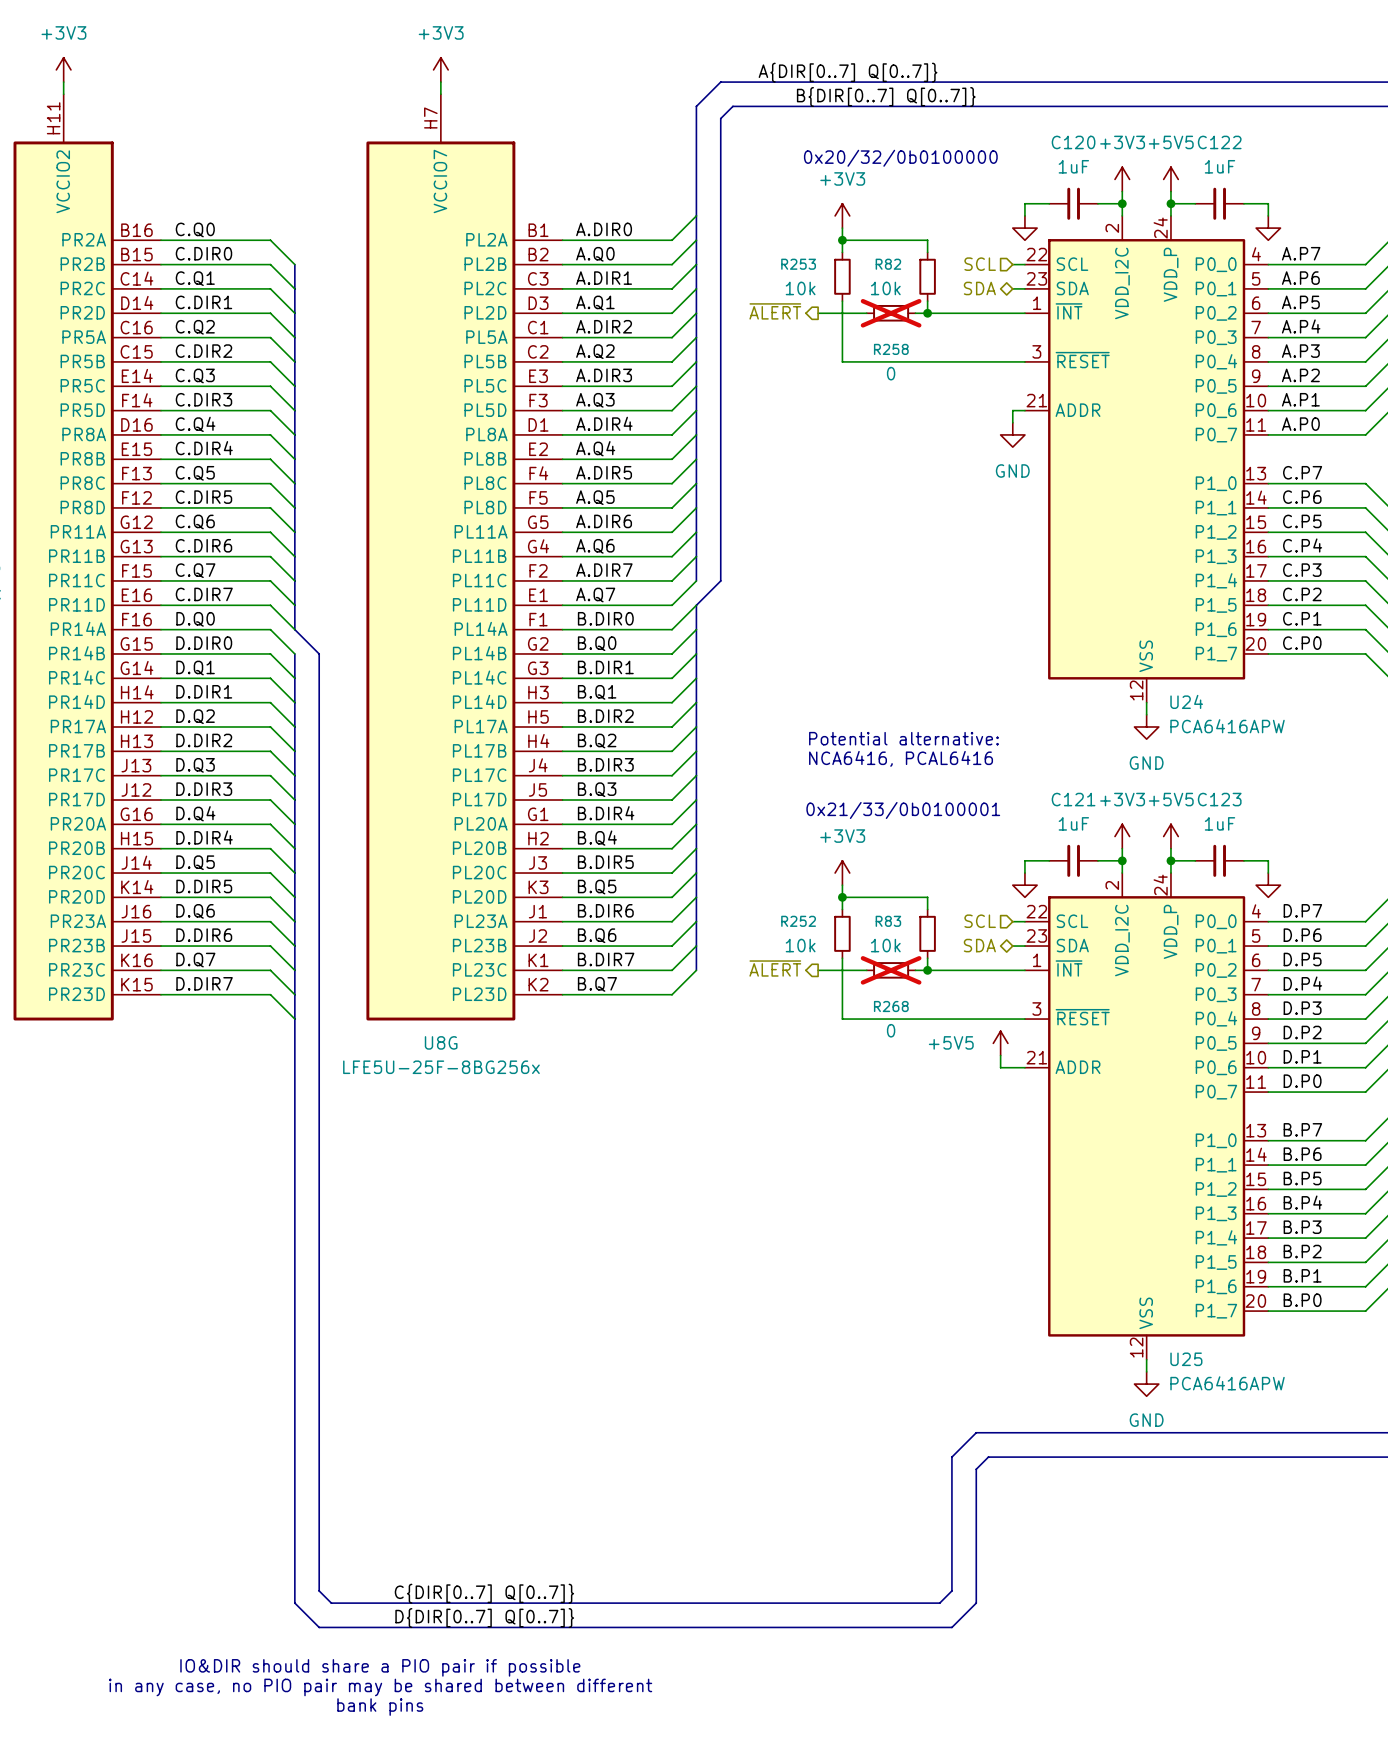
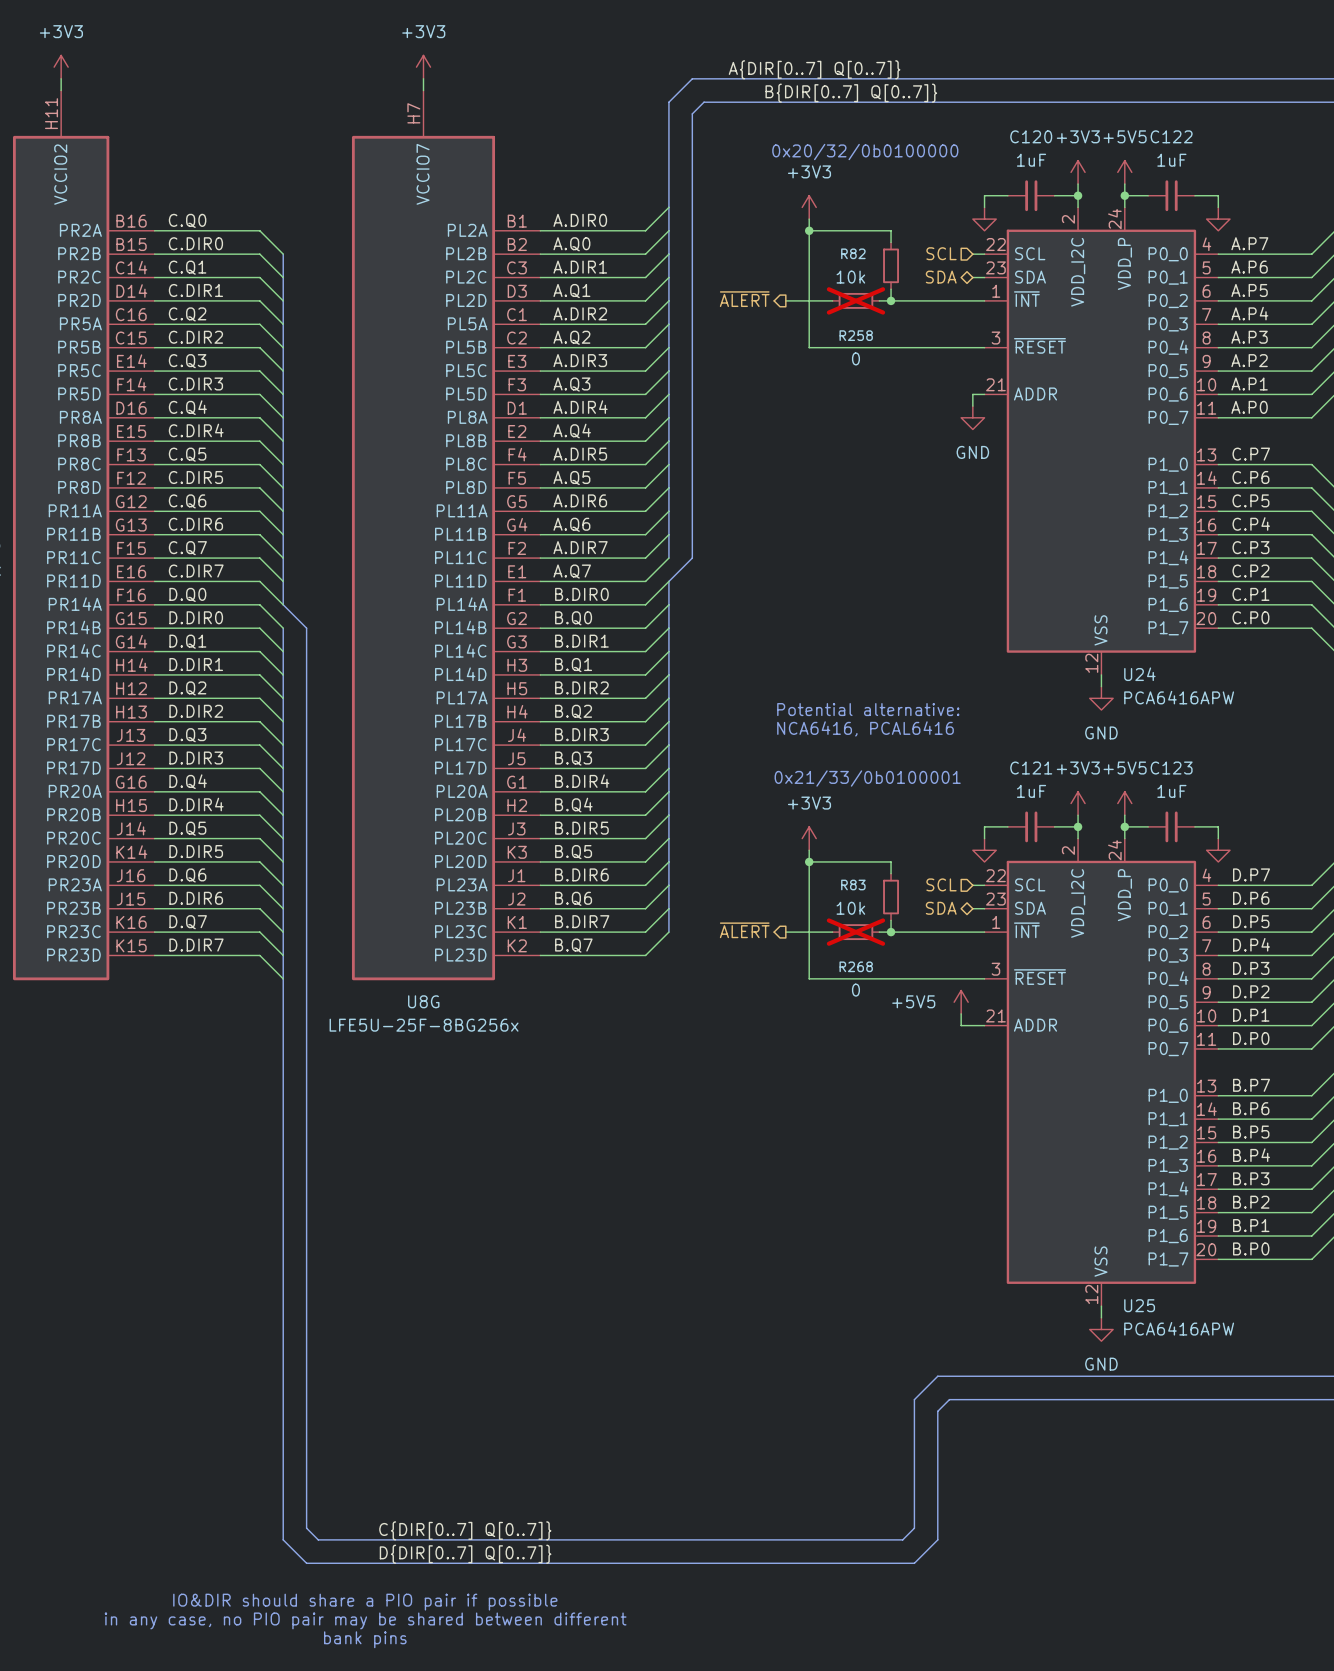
wire: none -> (809, 242) (809, 289)
R253: 10k (842, 276) -> none
wire: none -> (809, 873) (809, 920)
R252: 10k (842, 933) -> none

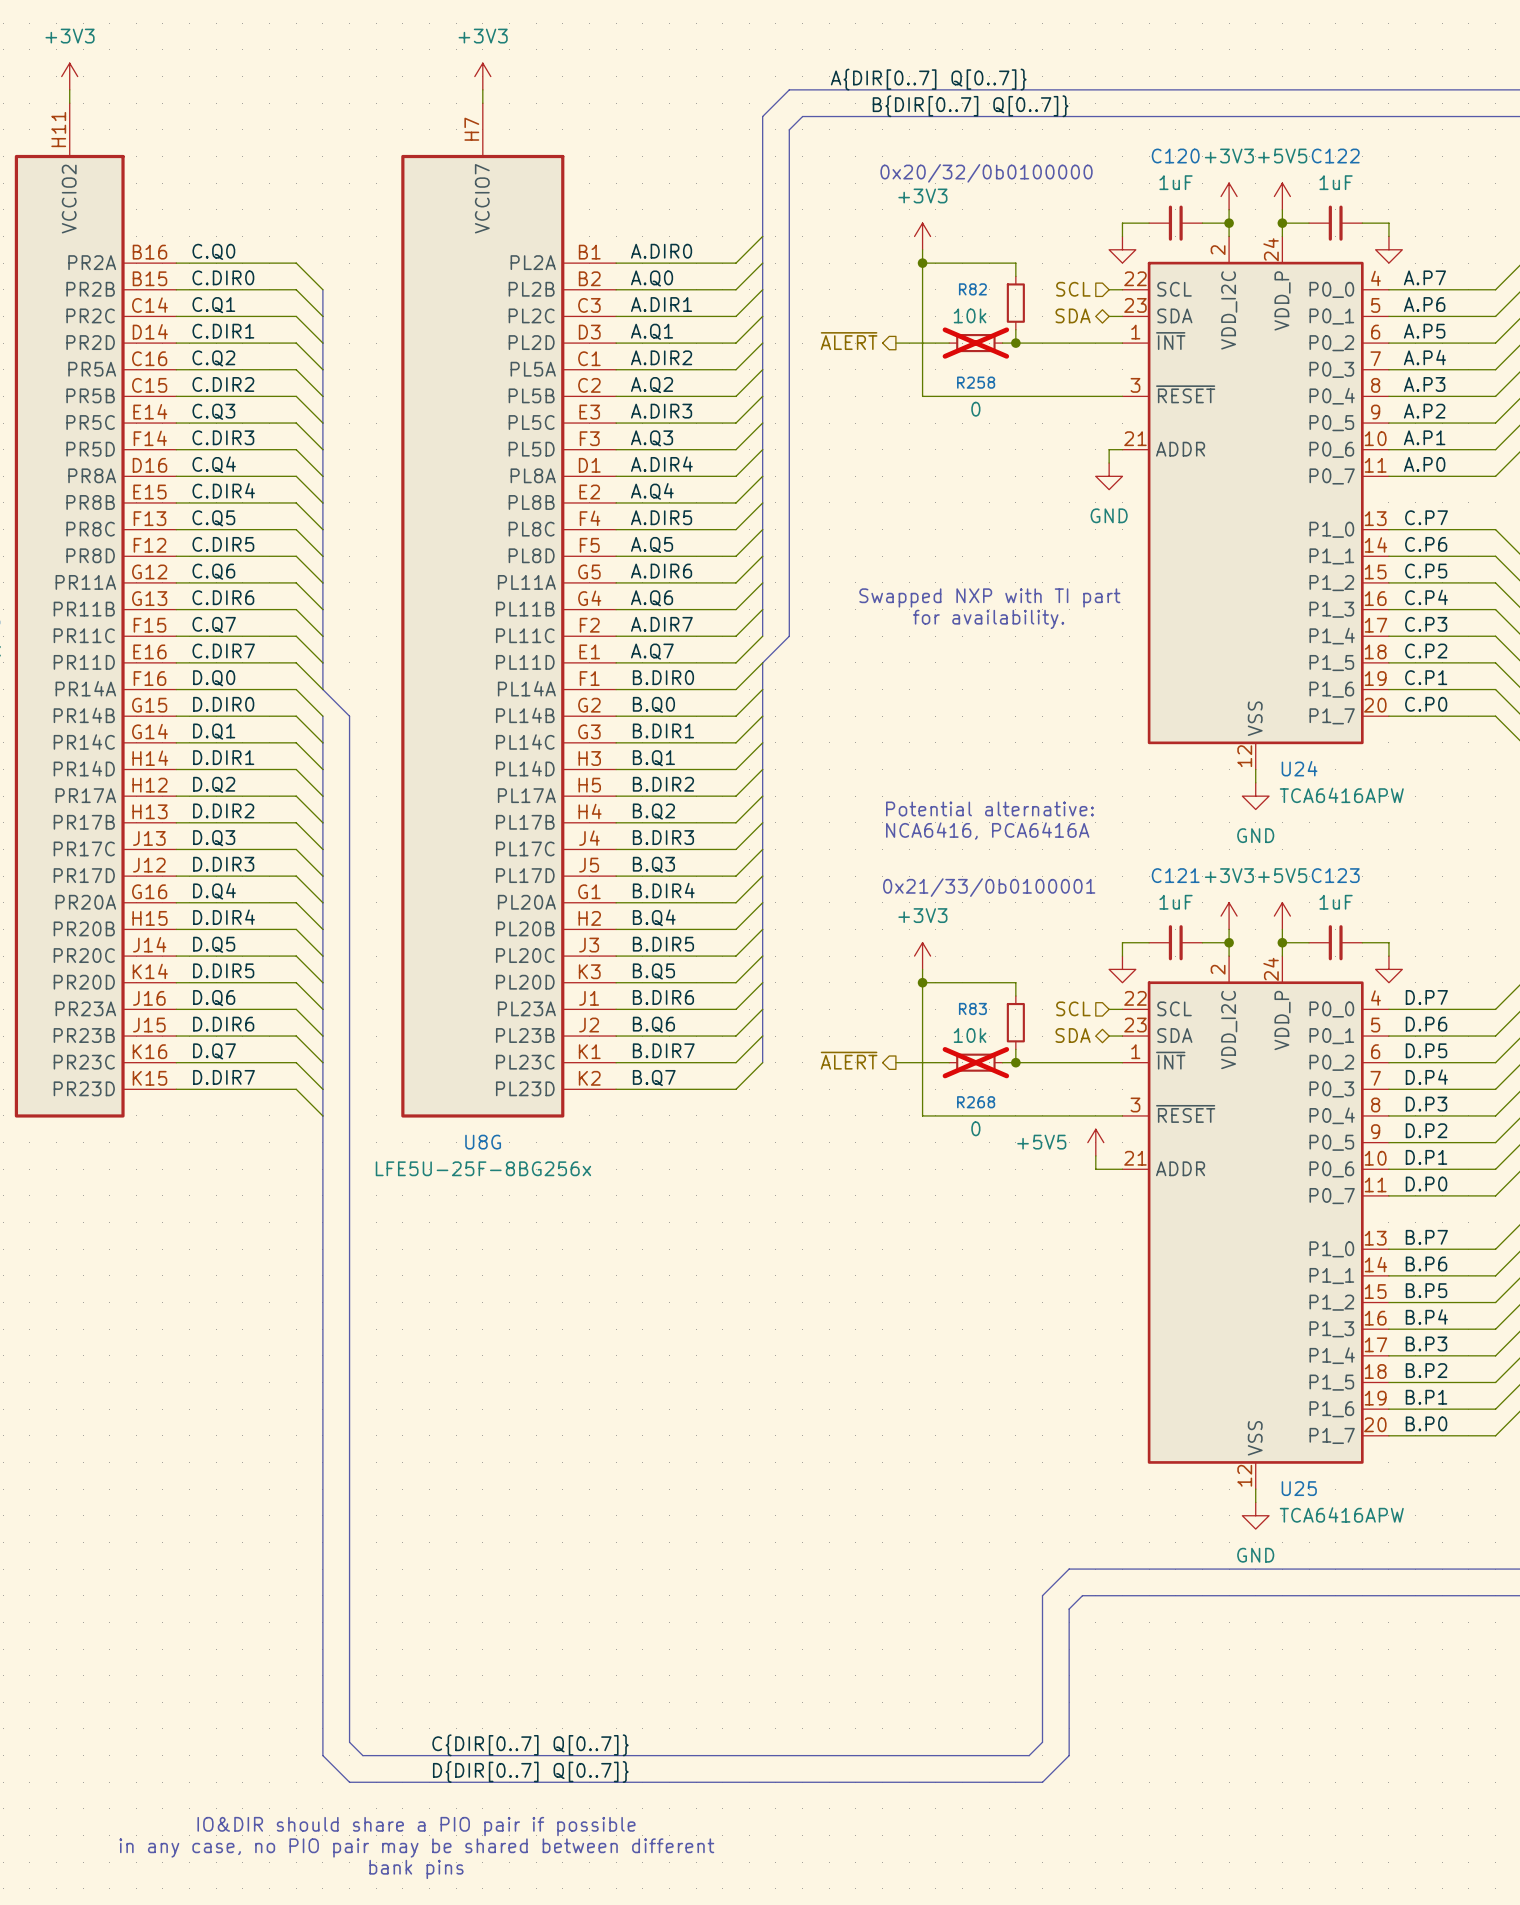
text: none -> Swapped NXP with TI part (989, 597)
text: none -> for availability. (988, 619)
U24 value: PCA6416APW (1179, 697) -> TCA6416APW (1341, 795)
text: NCA6416, PCAL6416 (865, 728) -> NCA6416, PCA6416A (987, 831)
U25 value: PCA6416APW (1179, 1328) -> TCA6416APW (1341, 1514)

